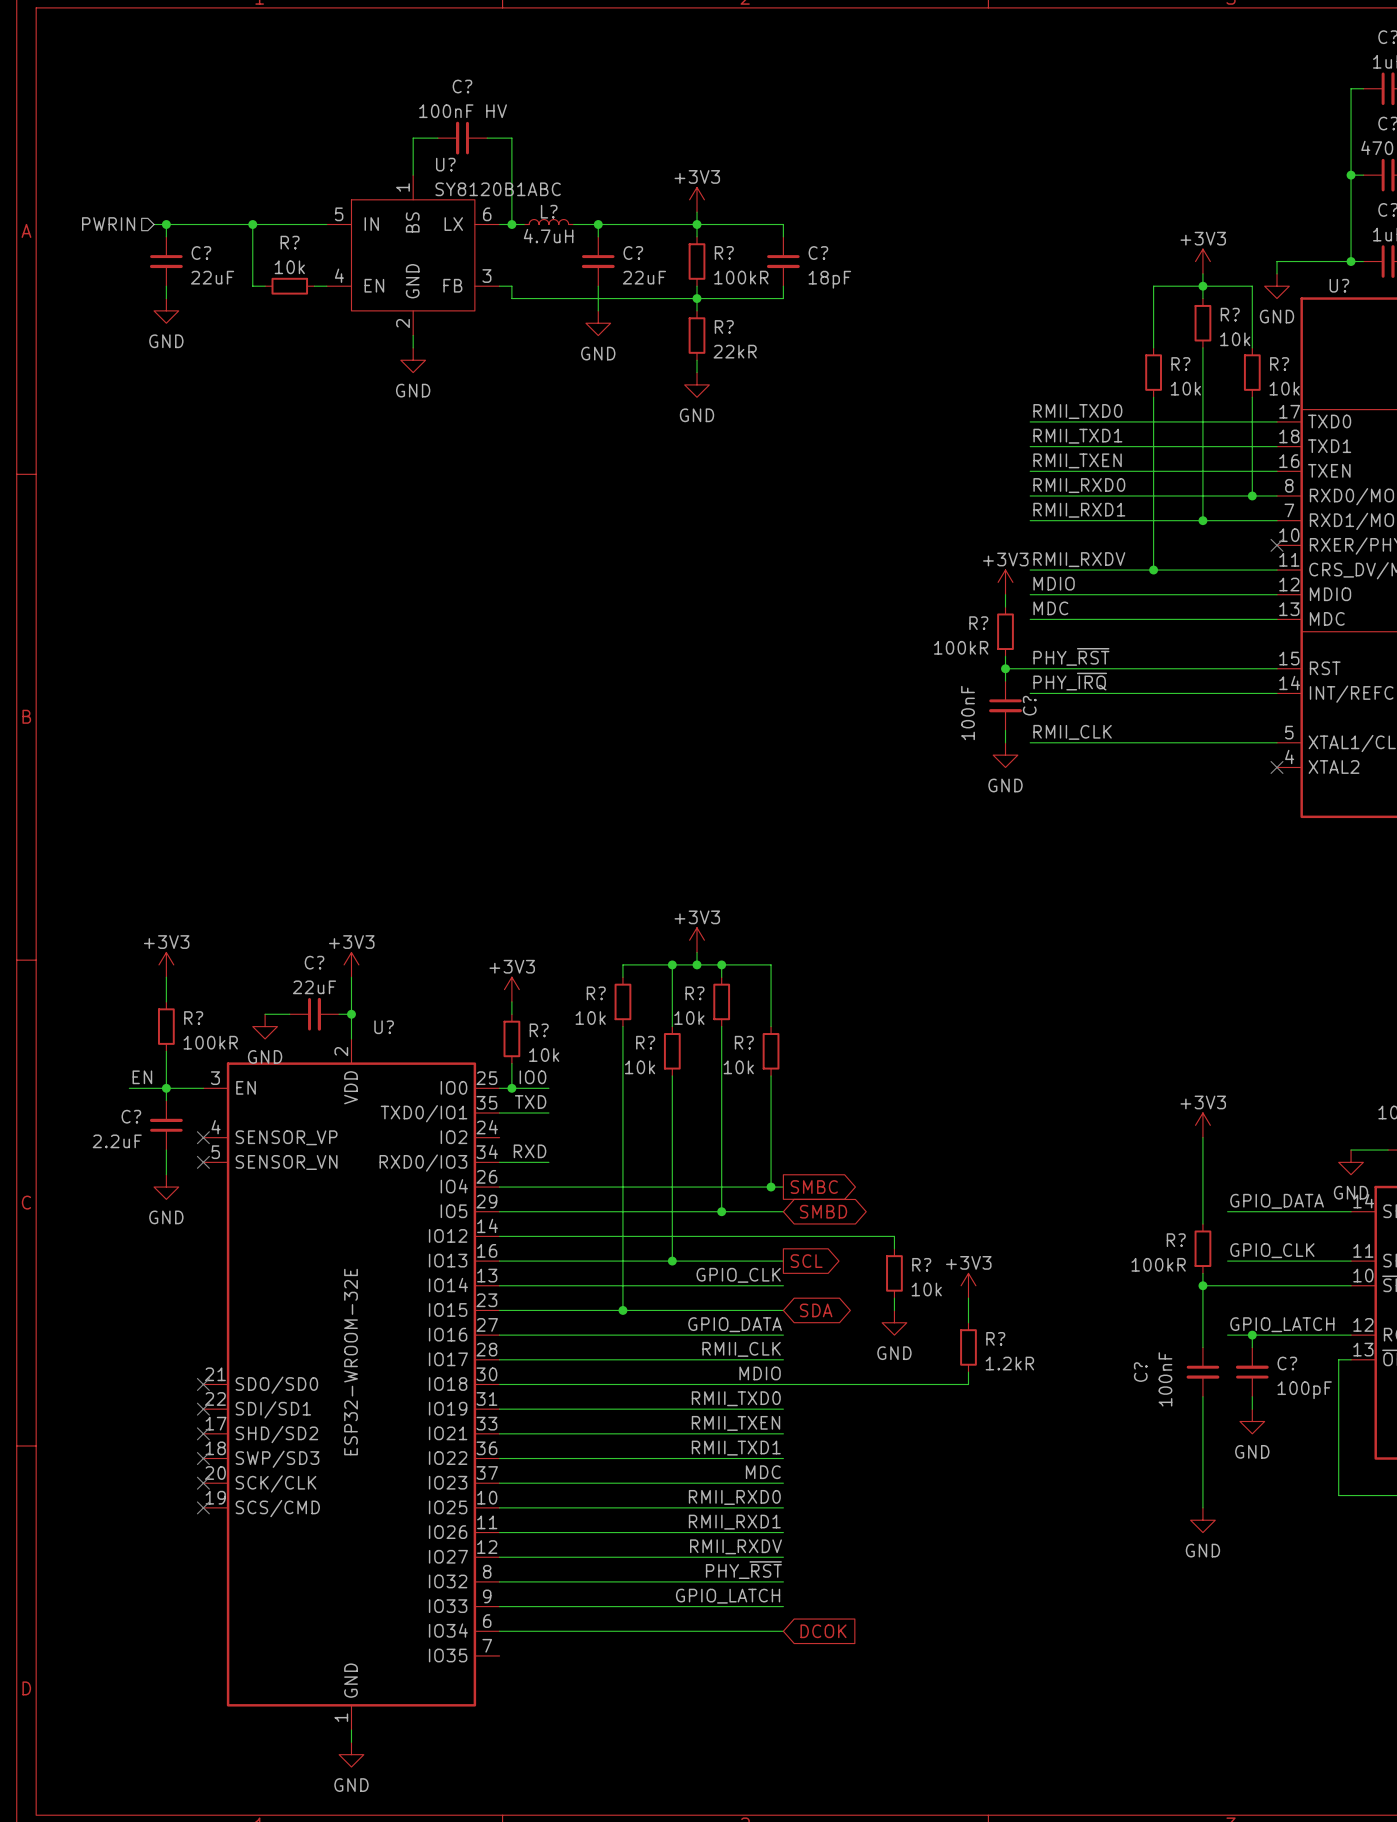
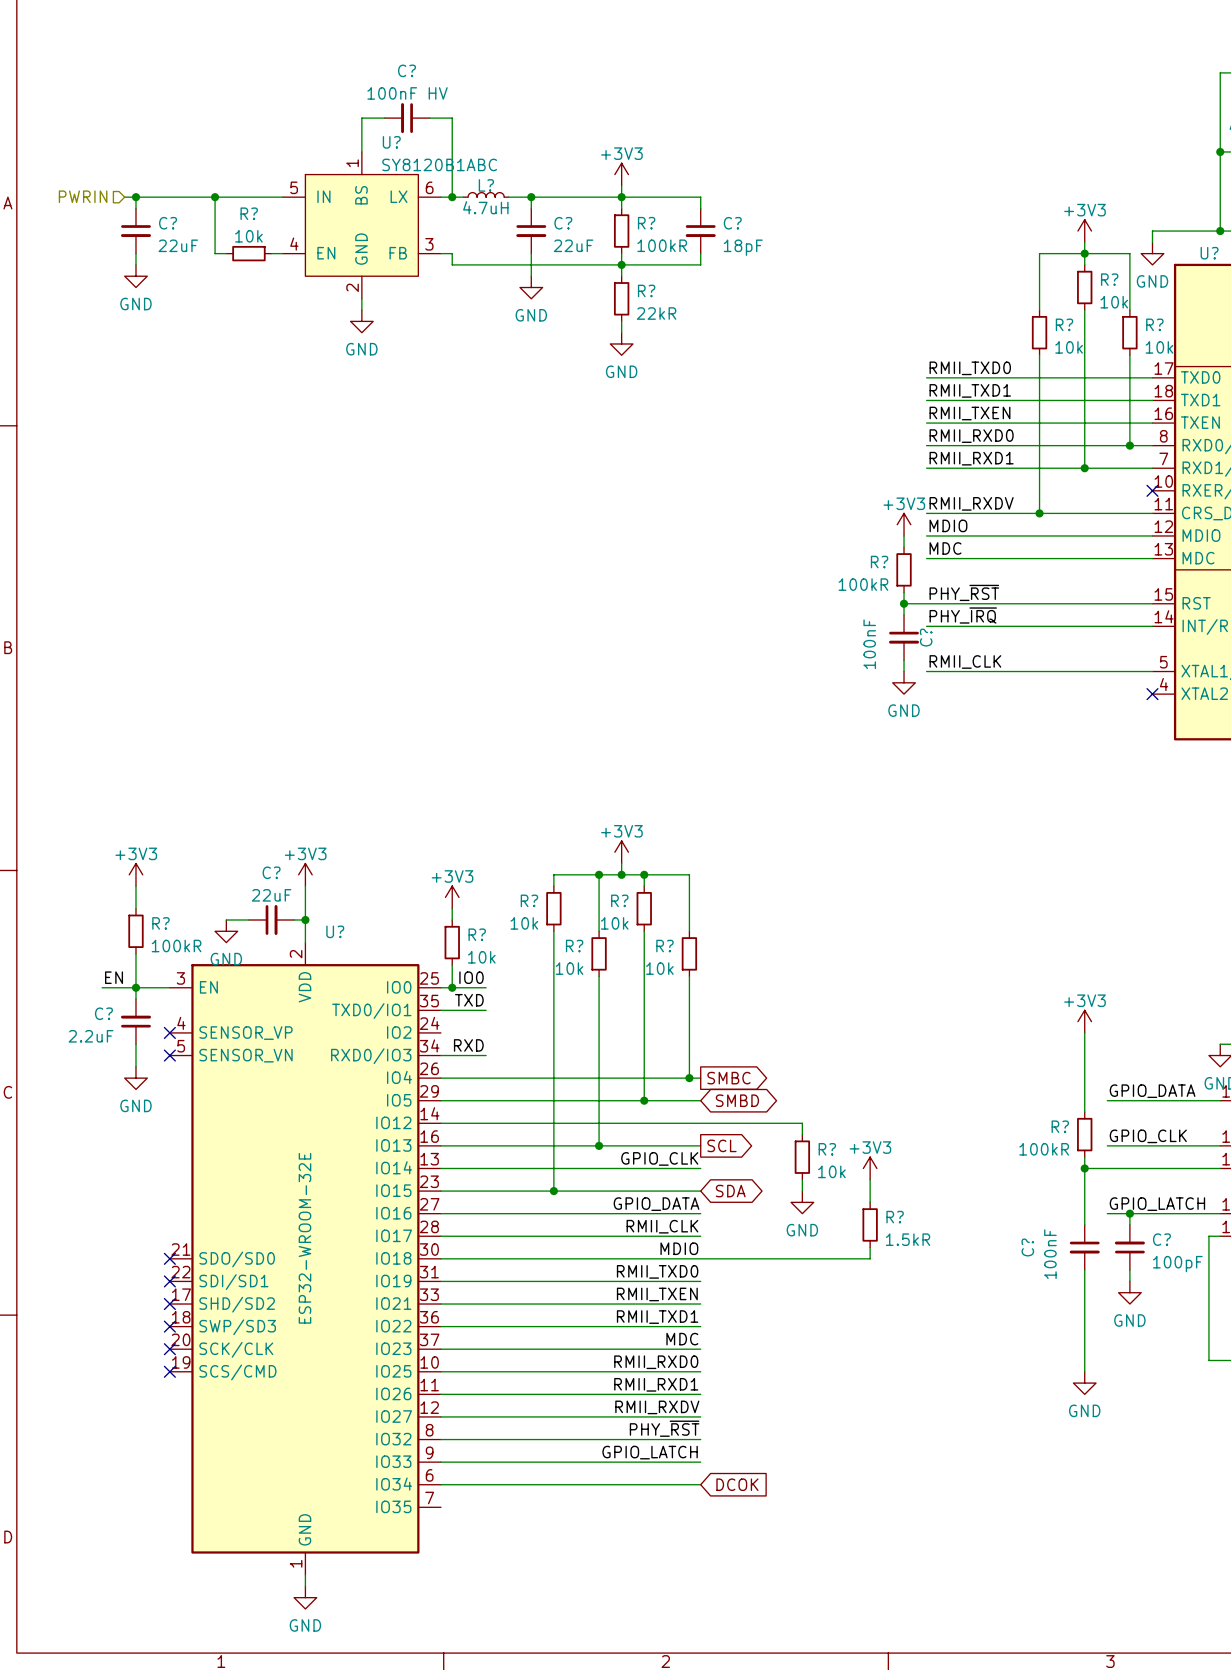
R? value: 1.2kR (1009, 1363) -> 1.5kR (908, 1239)

